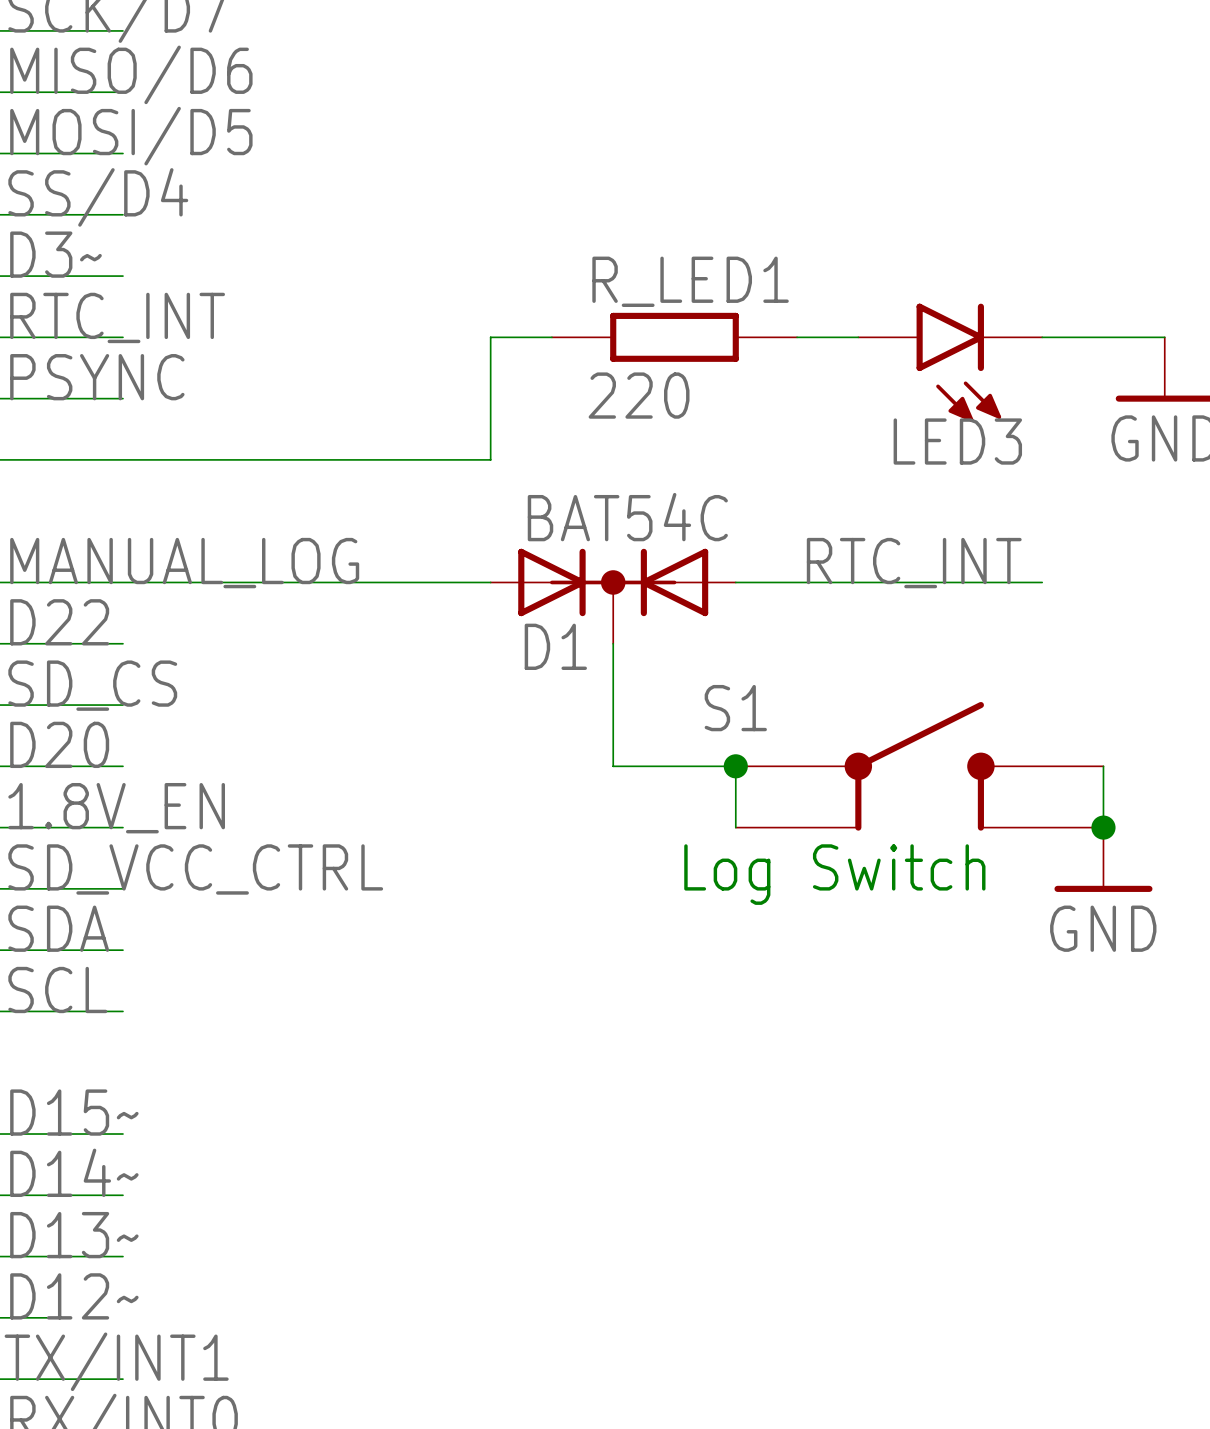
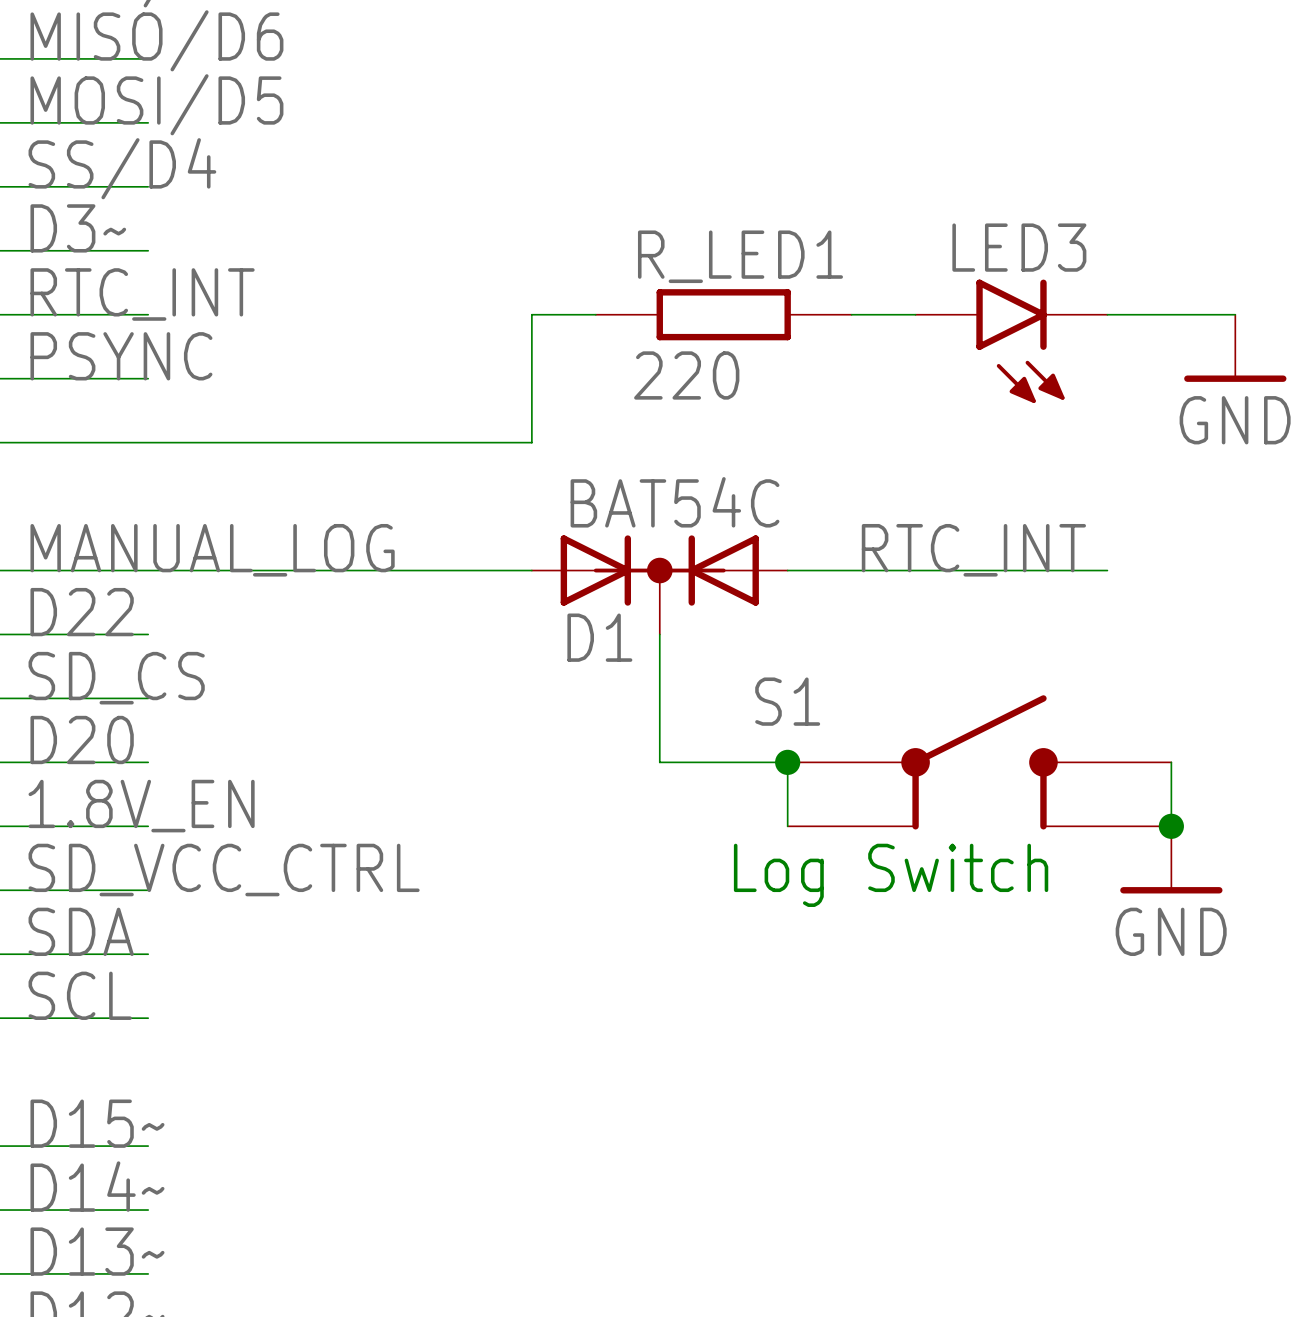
LED3 name position: LED3 (957, 441) -> LED3 (1019, 247)

